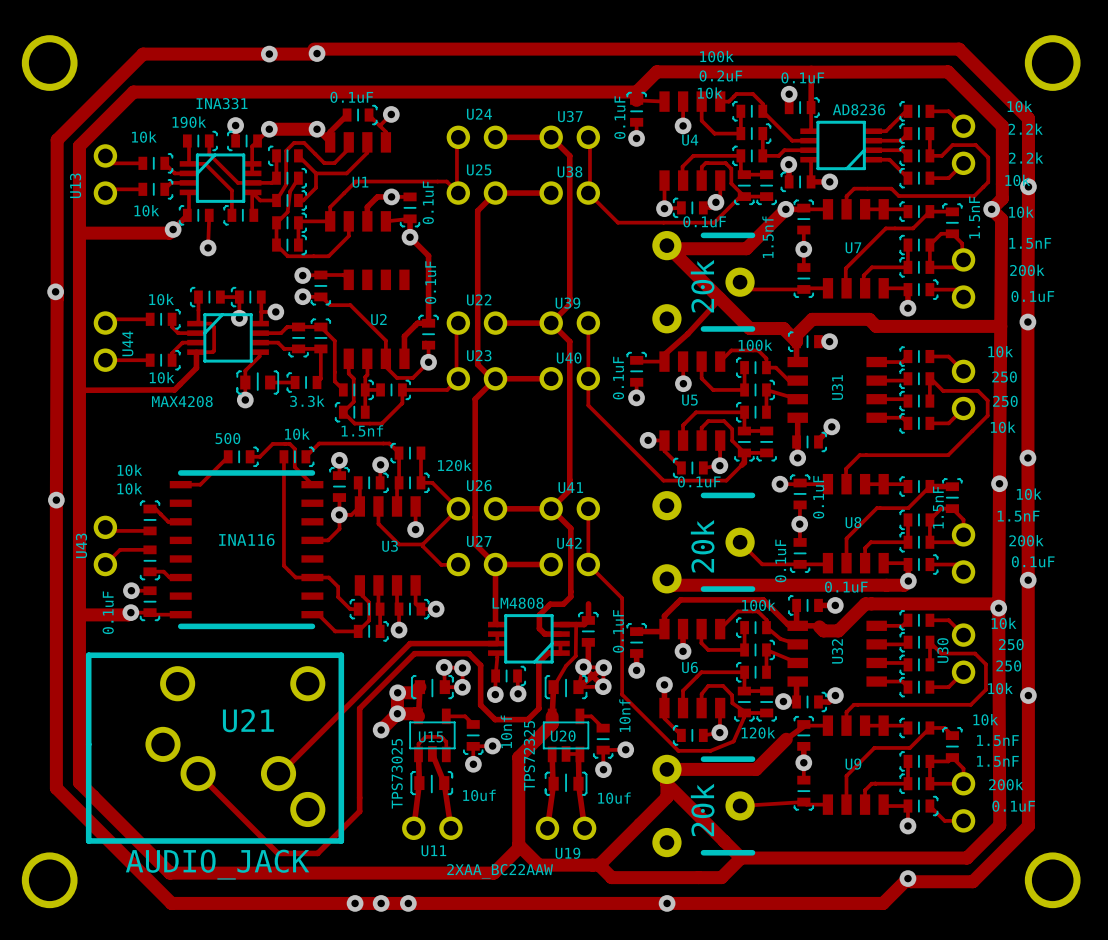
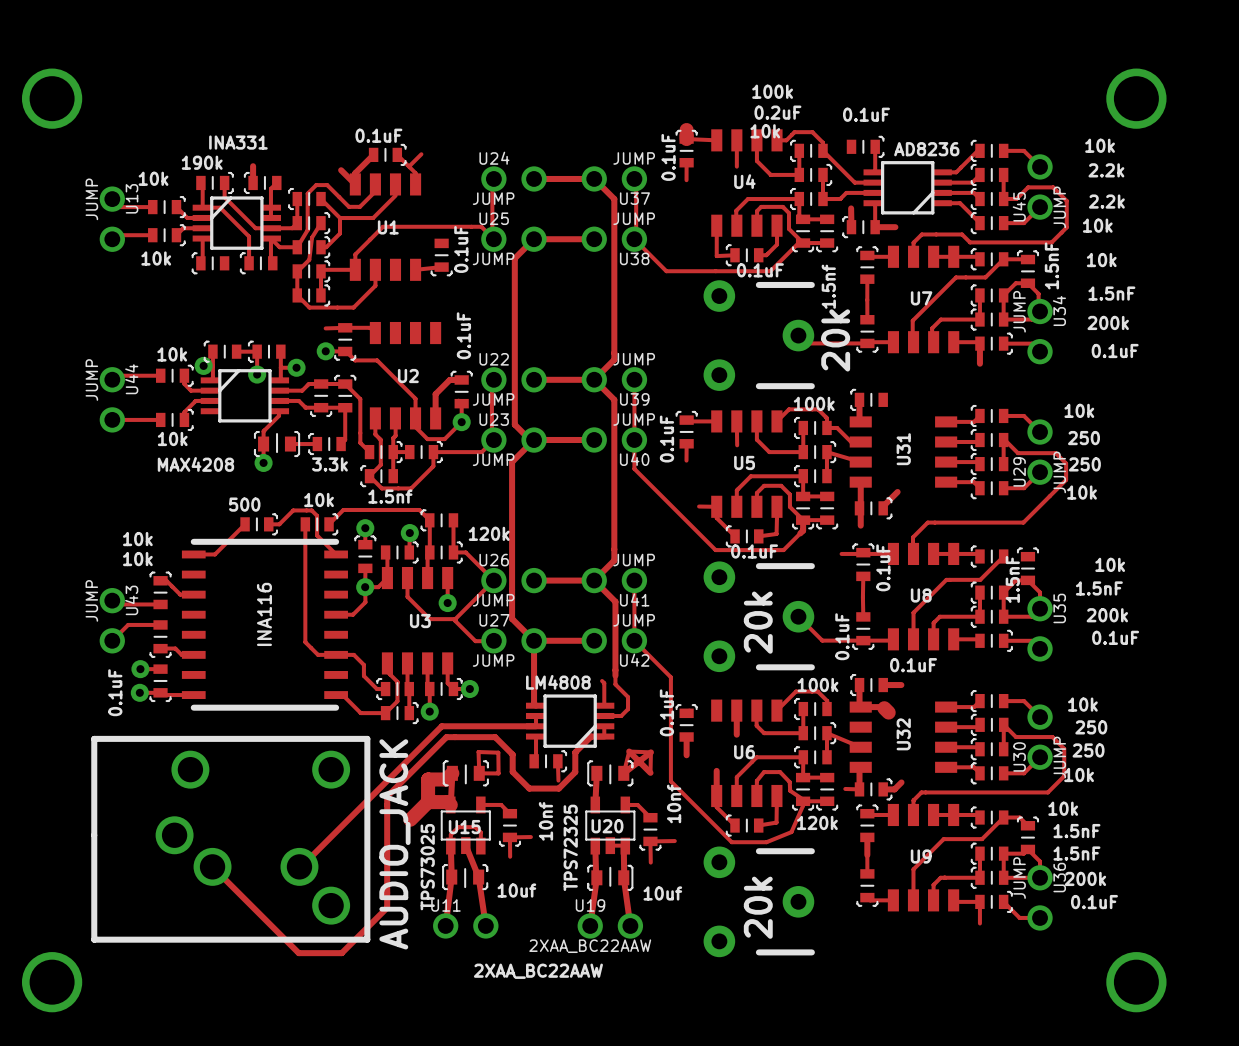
track: (314, 49) (959, 49) (1028, 118) (1028, 826) (972, 881) (911, 881) (907, 878) (883, 903) (171, 903) (56, 788) (57, 291) -> none
track: (317, 53) (143, 54) (57, 140) (57, 298) -> none
via: (317, 53) -> none
via: (269, 54) -> none
track: (811, 72) (811, 107) -> none
track: (811, 72) (656, 71) (636, 92) (133, 92) (79, 146) (79, 782) (169, 873) (493, 873) (518, 848) (518, 757) (552, 724) (552, 716) -> none
track: (811, 72) (948, 71) (1002, 126) (1002, 198) (991, 209) (1001, 219) (1000, 326) -> none
via: (789, 94) -> none
via: (391, 114) -> none
U24 name position: U24 (479, 114) -> U24 (494, 158)
U37 name position: U37 (570, 116) -> U37 (634, 198)
U37 value: none -> JUMP (634, 158)
via: (235, 125) -> none
via: (683, 125) -> none
via: (269, 129) -> none
track: (315, 129) (317, 129) (269, 129) (257, 141) -> none
via: (317, 129) -> none
via: (636, 138) -> none
U13 value: none -> JUMP (91, 199)
U24 value: none -> JUMP (493, 198)
U45 name: none -> U45 (1019, 206)
U45 value: none -> JUMP (1059, 207)
via: (788, 164) -> none
U25 name position: U25 (479, 169) -> U25 (494, 218)
U38 name position: U38 (569, 171) -> U38 (634, 258)
U38 value: none -> JUMP (634, 218)
via: (829, 181) -> none
U13 name position: U13 (75, 185) -> U13 (132, 198)
via: (1028, 186) -> none
via: (391, 196) -> none
track: (410, 196) (377, 196) (367, 207) (367, 221) -> none
via: (715, 202) -> none
via: (664, 208) -> none
via: (785, 209) -> none
track: (805, 209) (785, 209) (746, 248) (666, 248) (666, 245) -> none
via: (991, 209) -> none
U25 value: none -> JUMP (493, 258)
track: (187, 215) (169, 233) (79, 233) -> none
track: (209, 215) (208, 247) -> none
track: (410, 218) (410, 237) (428, 255) (428, 323) -> none
via: (173, 229) -> none
via: (410, 237) -> none
via: (208, 247) -> none
track: (670, 248) (749, 328) (783, 328) (796, 341) (796, 335) (812, 319) (869, 319) (876, 326) (1000, 326) -> none
via: (803, 249) -> none
U34 value: none -> JUMP (1019, 311)
U34 name: none -> U34 (1059, 310)
via: (302, 275) -> none
part value position: 20k (702, 286) -> 20k (835, 340)
via: (55, 291) -> none
track: (720, 298) (687, 333) (664, 354) (664, 361) -> none
U22 name position: U22 (479, 299) -> U22 (494, 359)
U39 name position: U39 (567, 303) -> U39 (634, 399)
U39 value: none -> JUMP (634, 359)
via: (907, 308) -> none
via: none -> (203, 365)
U44 value: none -> JUMP (91, 380)
via: (1027, 322) -> none
track: (196, 323) (210, 323) (214, 327) (214, 350) (196, 352) (196, 368) (174, 389) (79, 390) -> none
track: (1000, 326) (998, 608) -> none
U22 value: none -> JUMP (493, 399)
via: (829, 341) -> none
U44 name position: U44 (127, 343) -> U44 (131, 379)
U23 name position: U23 (479, 355) -> U23 (494, 419)
U40 name position: U40 (569, 358) -> U40 (634, 459)
U40 value: none -> JUMP (634, 419)
via: (683, 383) -> none
U23 value: none -> JUMP (493, 459)
via: (636, 397) -> none
U29 name: none -> U29 (1019, 471)
U29 value: none -> JUMP (1059, 472)
via: (831, 426) -> none
via: (648, 440) -> none
via: (797, 457) -> none
via: (1027, 458) -> none
via: (719, 465) -> none
via: (999, 483) -> none
via: (779, 484) -> none
U26 name position: U26 (479, 485) -> U26 (494, 560)
track: (929, 486) (952, 486) -> none
U41 name position: U41 (570, 487) -> U41 (634, 599)
U41 value: none -> JUMP (634, 560)
via: (56, 500) -> none
via: (799, 524) -> none
U43 value: none -> JUMP (91, 600)
U26 value: none -> JUMP (493, 600)
U35 name: none -> U35 (1059, 608)
part value rotation: 0° (246, 539) -> 90° counterclockwise (264, 614)
U27 name position: U27 (479, 541) -> U27 (494, 620)
U42 name position: U42 (569, 543) -> U42 (634, 660)
U43 name position: U43 (81, 545) -> U43 (131, 600)
U42 value: none -> JUMP (634, 620)
track: (908, 564) (908, 581) (904, 585) (673, 585) (666, 578) -> none
via: (1028, 580) -> none
via: (908, 581) -> none
U27 value: none -> JUMP (493, 660)
track: (570, 596) (563, 604) (550, 604) (539, 615) (539, 628) (544, 634) (560, 634) -> (615, 675) (615, 684) (628, 697) (628, 709) (621, 715) (604, 715)
track: (588, 603) (588, 620) (584, 624) (560, 624) -> (602, 680) (604, 683) (604, 705)
via: (835, 605) -> none
track: (998, 608) (999, 825) (967, 858) (741, 858) -> none
track: (998, 608) (994, 603) (865, 603) (838, 630) (823, 630) -> none
via: (998, 608) -> none
track: (130, 612) (128, 614) (79, 614) -> none
track: (576, 624) (575, 656) (566, 665) (553, 687) -> none
track: (796, 624) (788, 624) (763, 599) (680, 599) (664, 615) (664, 629) (661, 631) (636, 631) -> none
track: (766, 627) (780, 638) (797, 644) -> none
part: (588, 629) -> none
track: (588, 642) (588, 662) (583, 666) -> none
U30 name position: U30 (942, 650) -> U30 (1019, 756)
via: (683, 651) -> none
track: (548, 653) (538, 662) (538, 708) (527, 719) (495, 719) (480, 705) (480, 665) (468, 653) (459, 653) -> (591, 736) (575, 752) (575, 772) (558, 788) (529, 788) (512, 771) (512, 754) (495, 737)
track: (497, 657) (495, 694) -> (536, 741) (536, 759)
via: (583, 666) -> none
via: (444, 667) -> none
via: (462, 667) -> none
via: (603, 667) -> none
via: (636, 670) -> none
U30 value: none -> JUMP (1059, 757)
via: (664, 684) -> none
track: (603, 686) (578, 687) -> none
via: (603, 686) -> none
via: (462, 687) -> none
via: (397, 692) -> none
via: (518, 693) -> none
via: (495, 694) -> none
via: (835, 695) -> none
via: (1028, 695) -> none
via: (783, 701) -> none
via: (397, 713) -> none
U21 name: U21 (248, 720) -> none
track: (804, 725) (786, 739) (756, 769) (666, 769) (666, 797) (599, 865) -> none
via: (381, 730) -> none
via: (719, 732) -> none
via: (492, 746) -> none
via: (625, 749) -> none
via: (803, 762) -> none
via: (473, 764) -> none
via: (603, 769) -> none
track: (666, 783) (741, 858) -> none
U36 value: none -> JUMP (1019, 878)
U36 name: none -> U36 (1059, 877)
track: (803, 802) (740, 805) -> none
via: (907, 826) -> none
track: (518, 845) (538, 865) (599, 865) -> none
U19 value: none -> 2XAA_BC22AAW (590, 946)
U11 name position: U11 (433, 850) -> U11 (445, 905)
U19 name position: U19 (567, 853) -> U19 (590, 905)
track: (741, 858) (721, 877) (611, 877) (599, 865) -> none
U21 value rotation: 0° (217, 864) -> 90° counterclockwise (394, 844)
via: (907, 878) -> none
via: (355, 903) -> none
via: (381, 903) -> none
via: (408, 903) -> none
via: (667, 903) -> none

